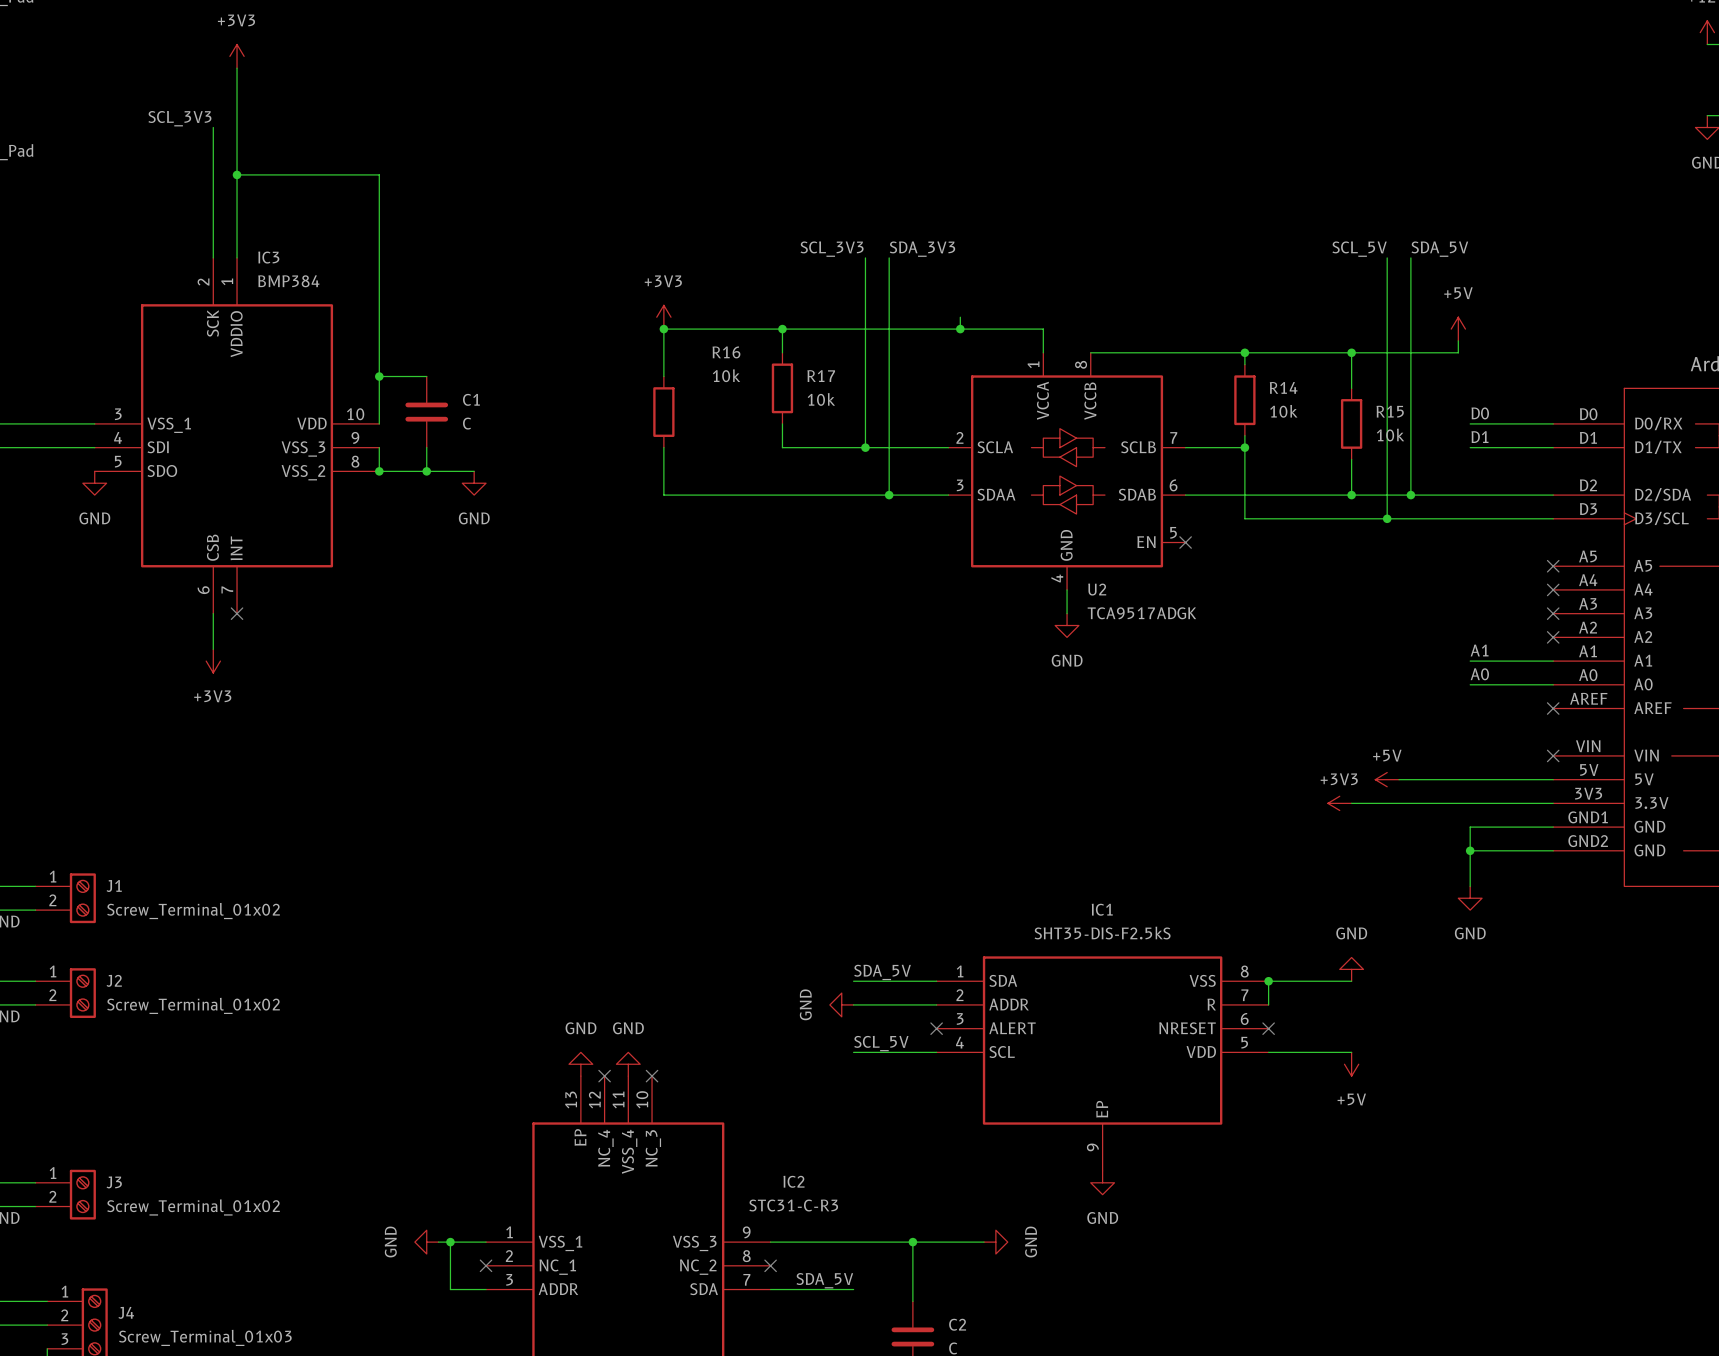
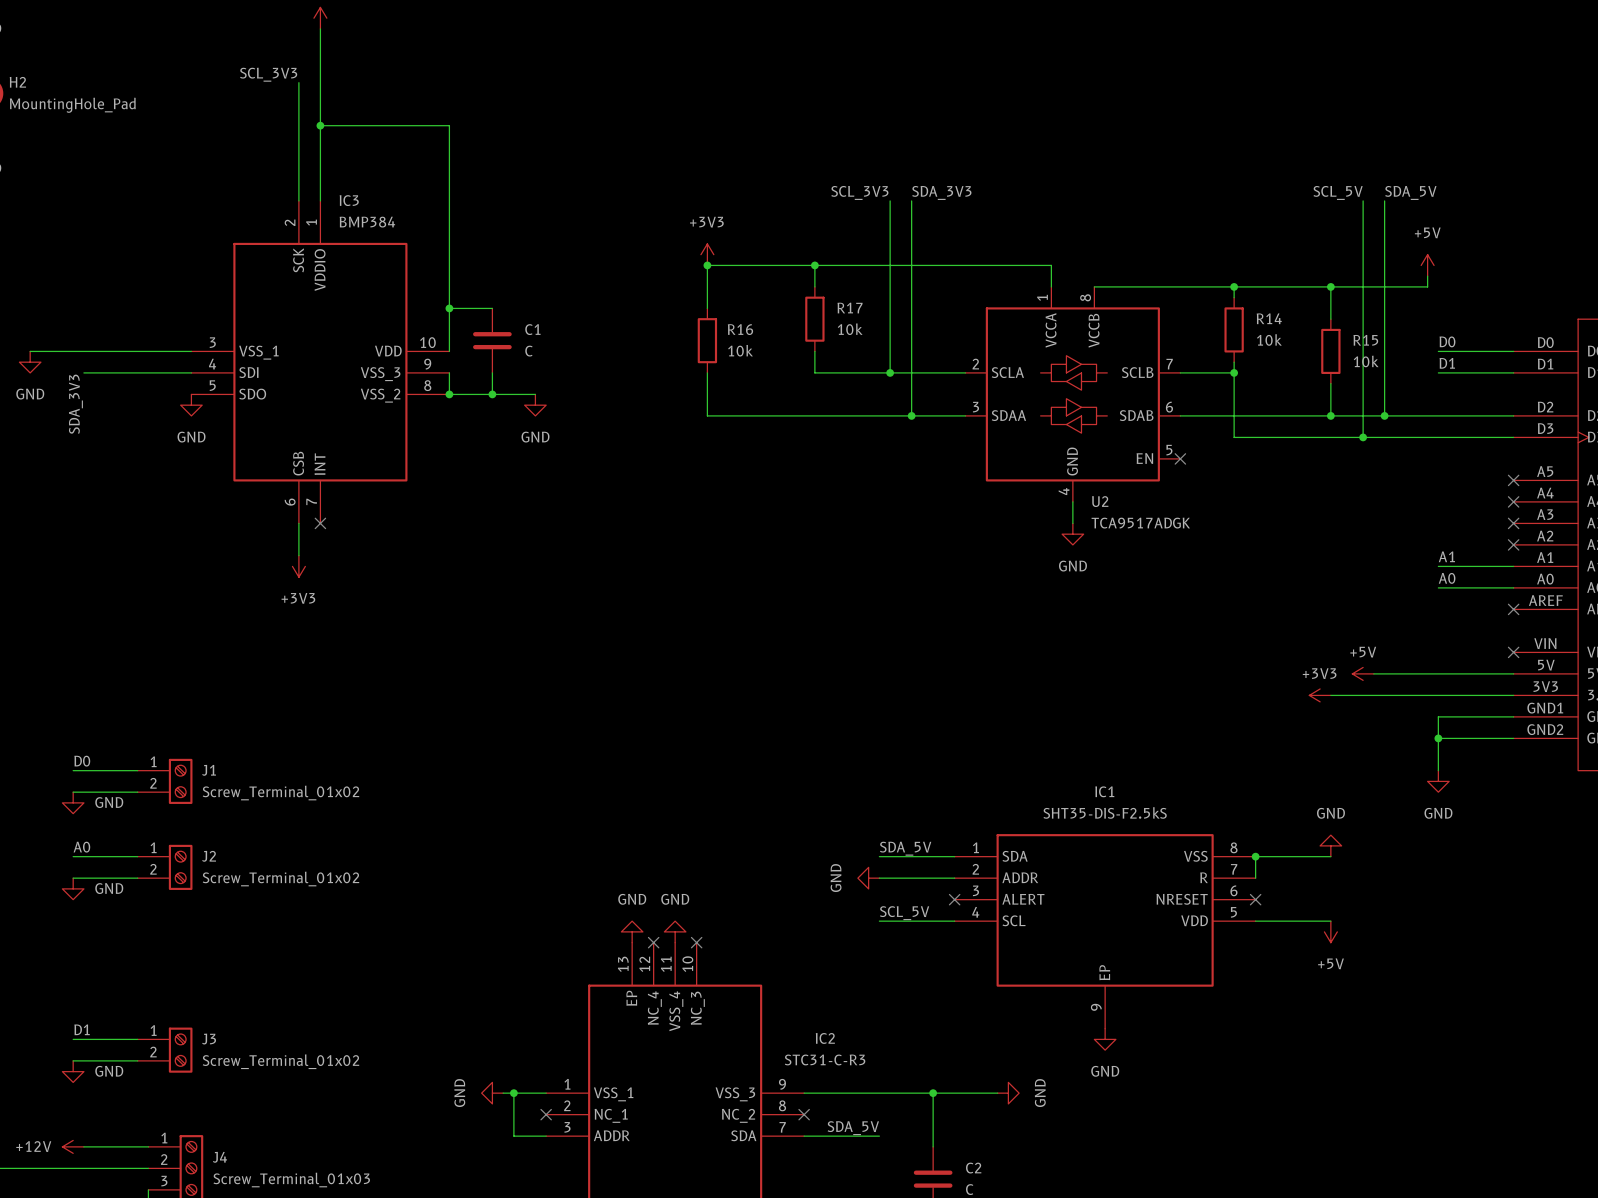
wire: (960, 317) (960, 329) -> none
junction: (960, 329) -> none
R16 name position: R16 (726, 352) -> R16 (740, 329)
R16 value position: 10k (726, 375) -> 10k (740, 350)

